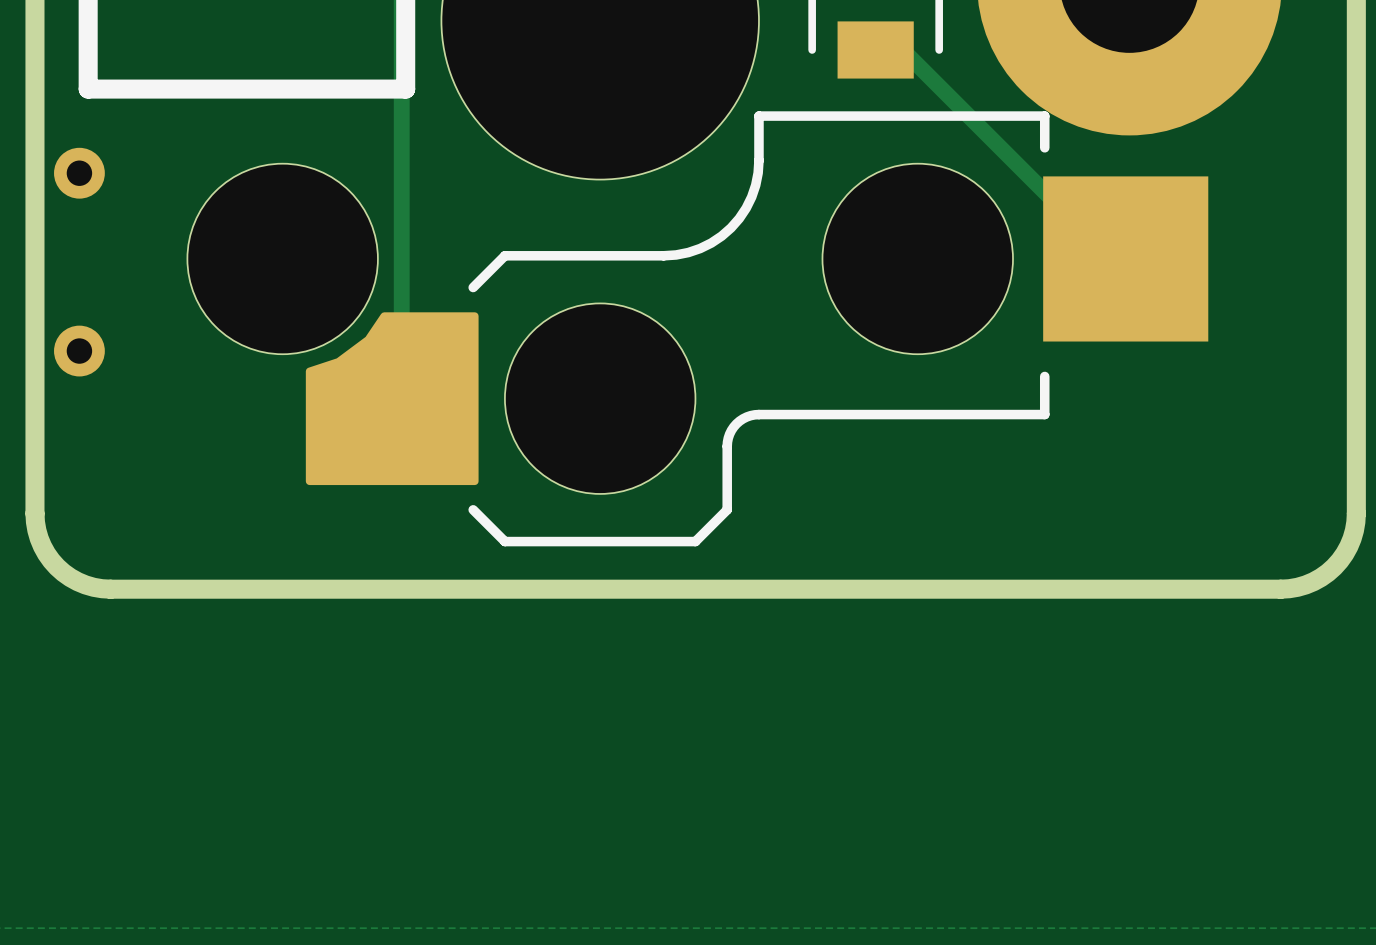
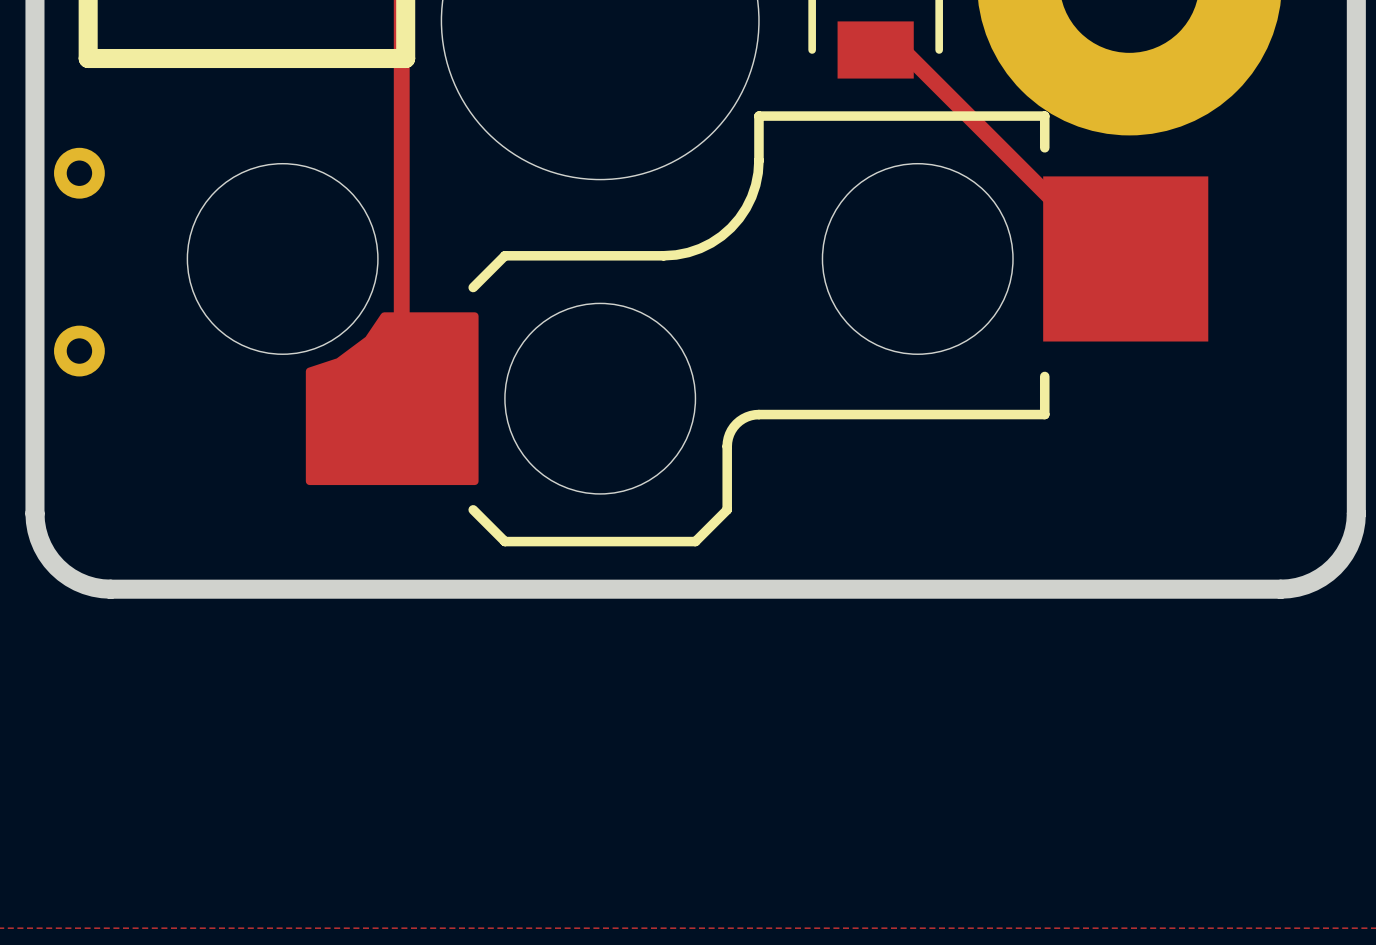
line: (88, 58) (88, 89) (405, 89) (405, 58) -> (88, 58) (405, 58)

